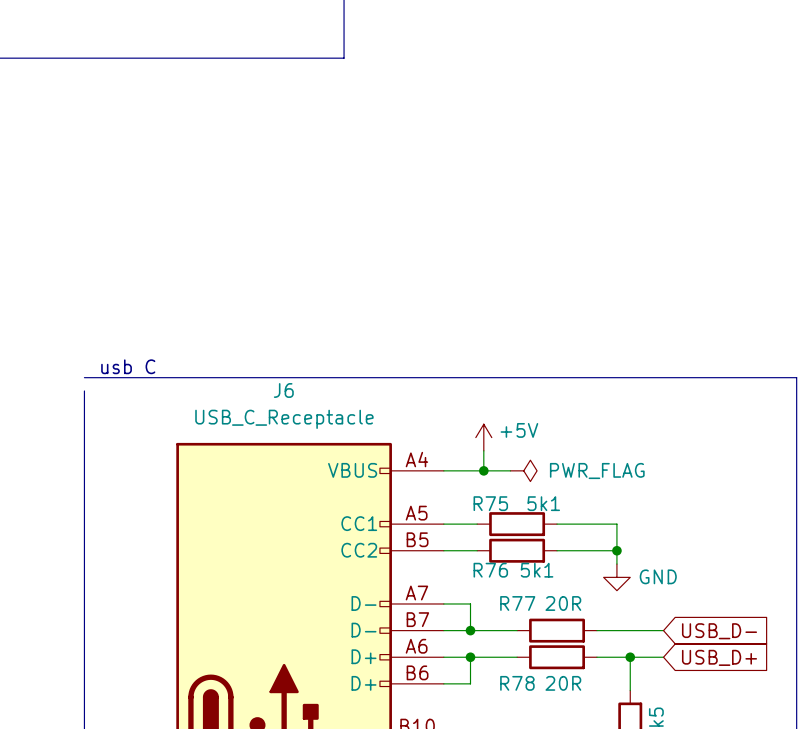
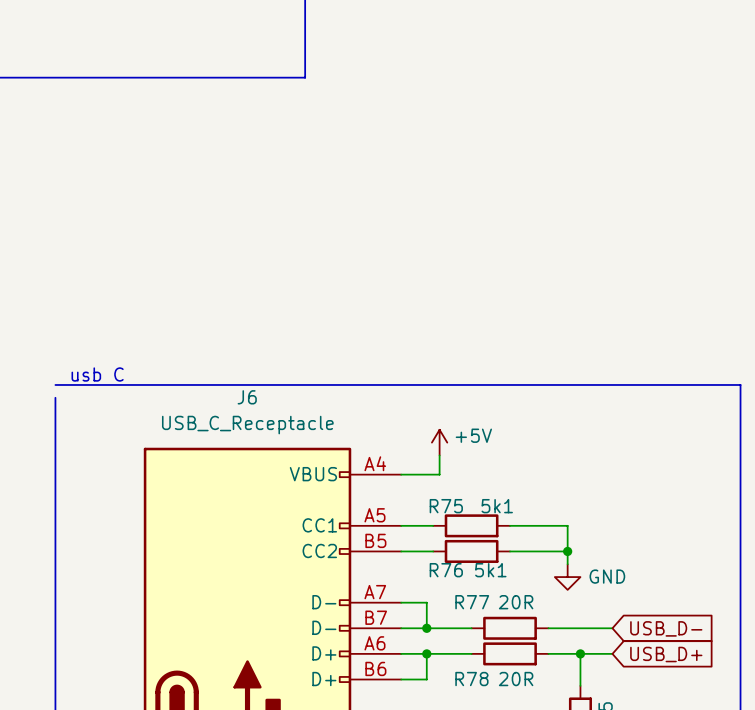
wire: (483, 470) (510, 470) -> none
junction: (483, 470) -> none
power symbol: PWR_FLAG (523, 470) -> none

